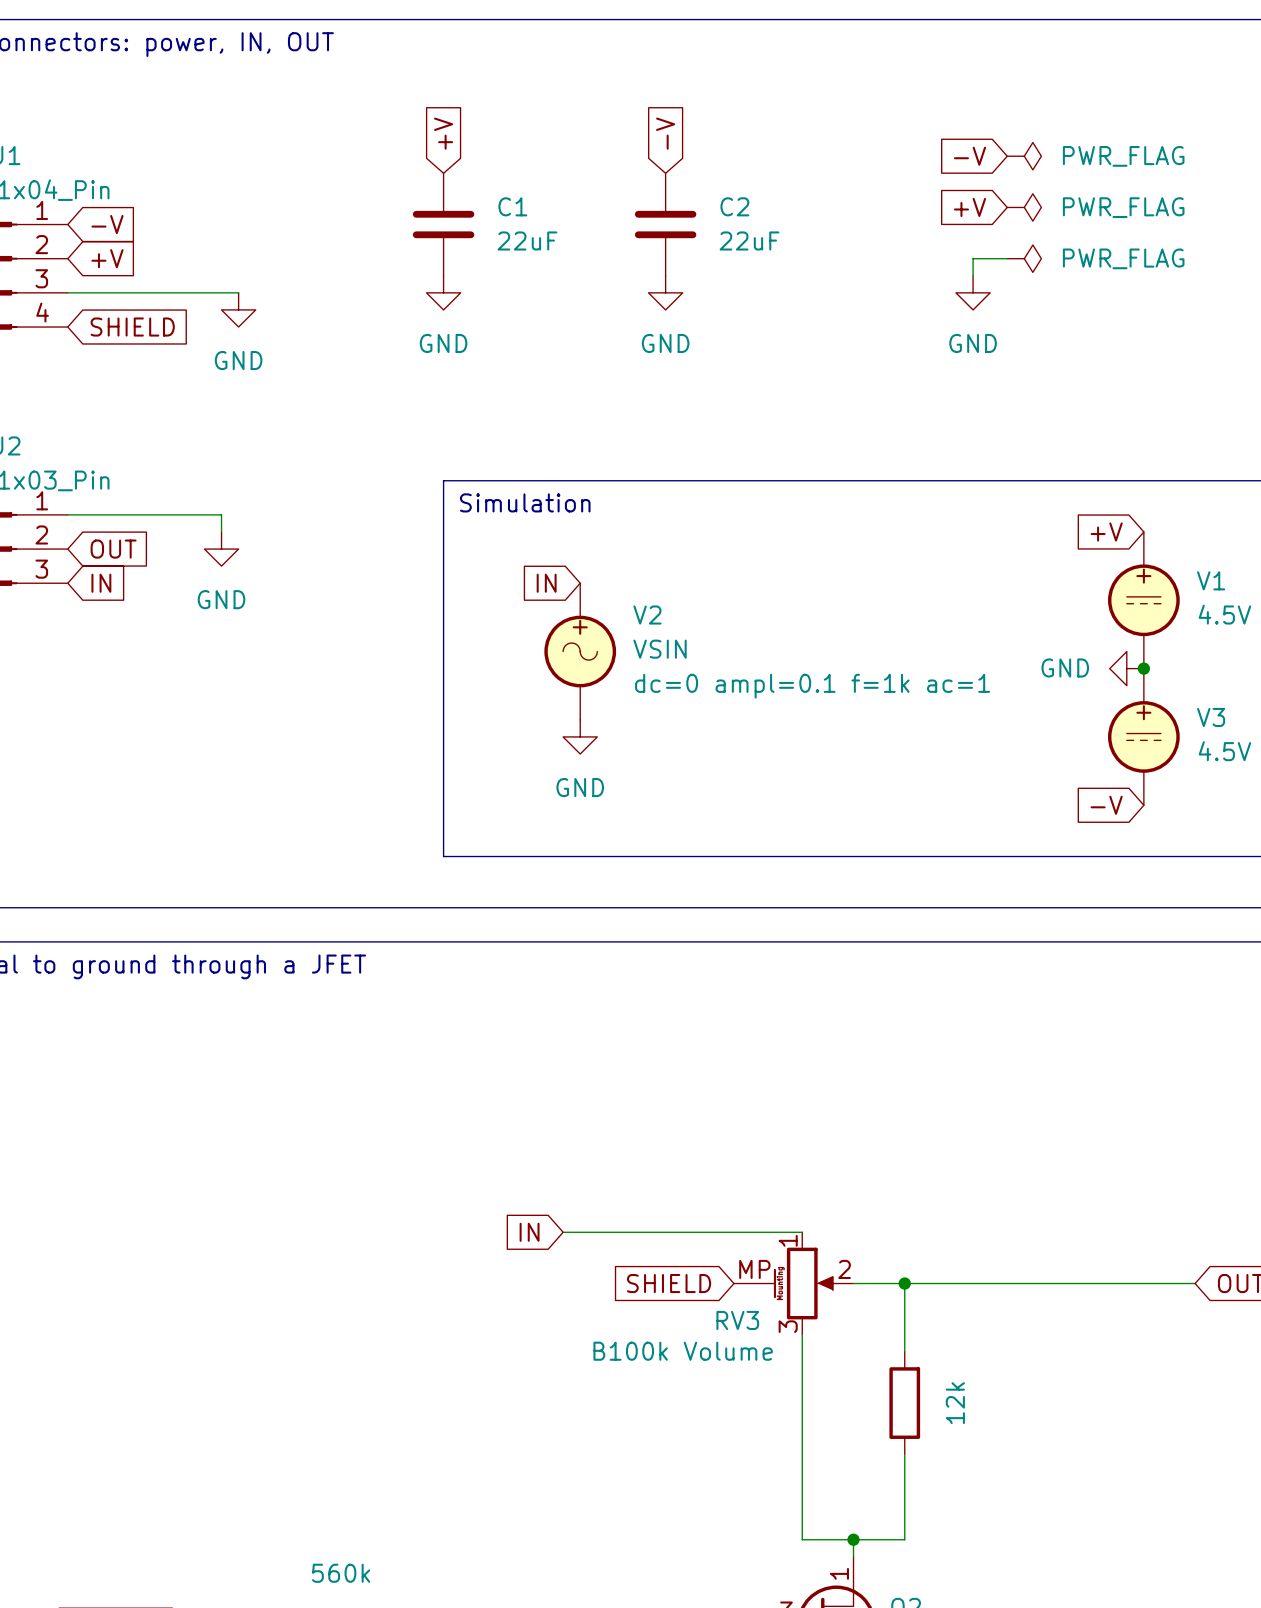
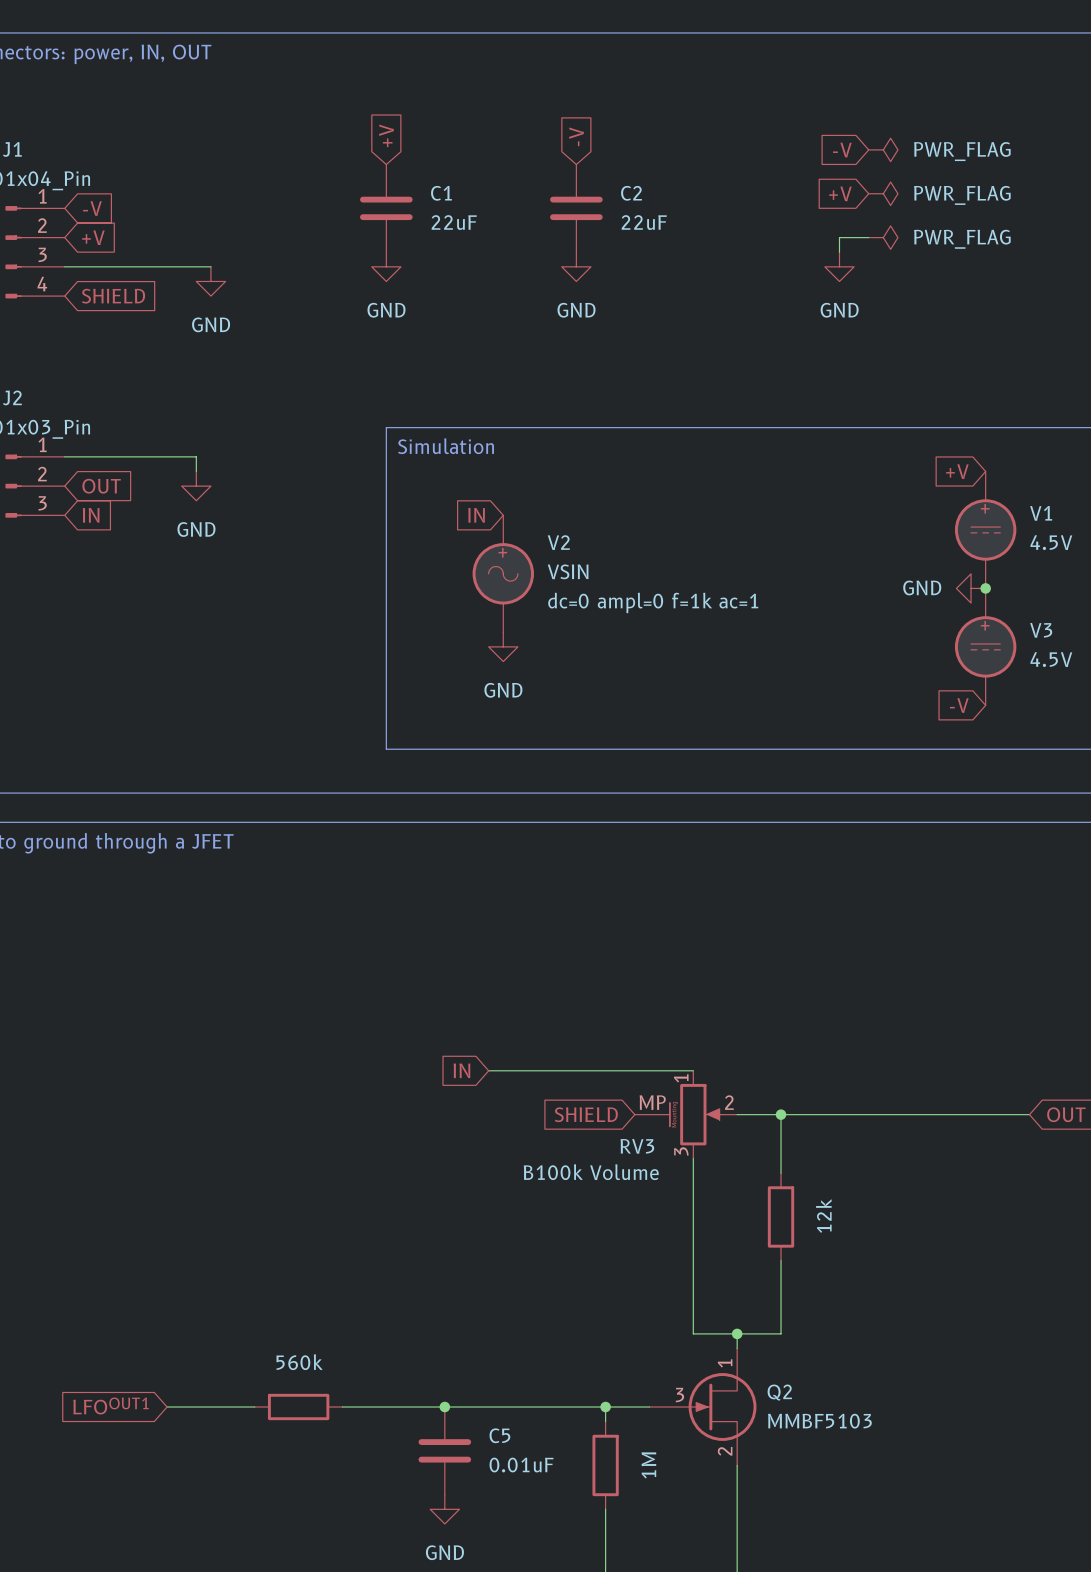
V2 text: dc=0 ampl=0.1 f=1k ac=1 (812, 686) -> dc=0 ampl=0 f=1k ac=1 (653, 602)

